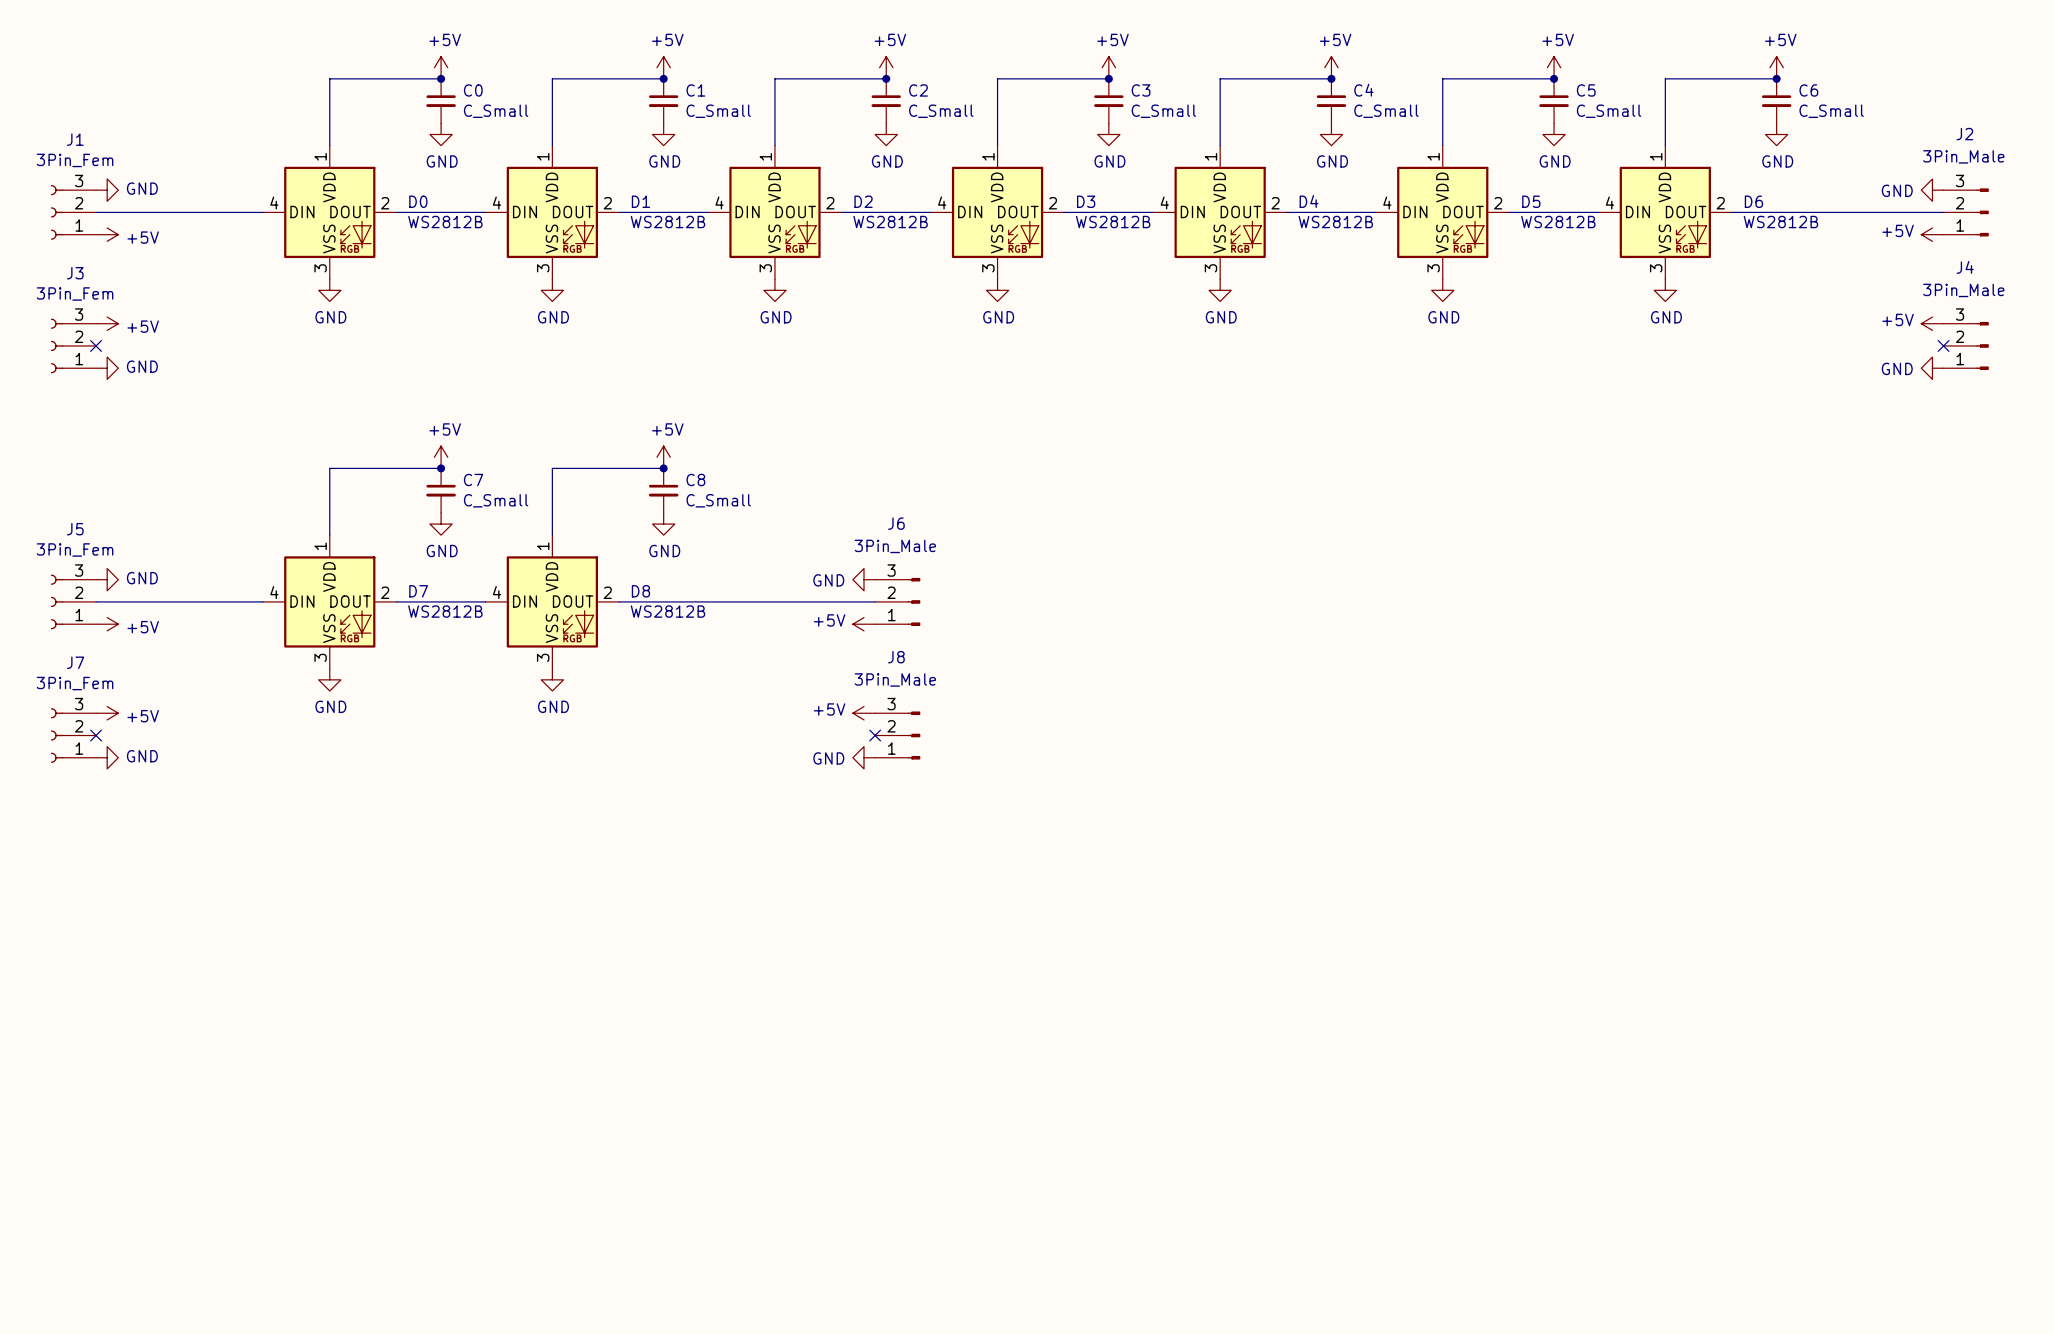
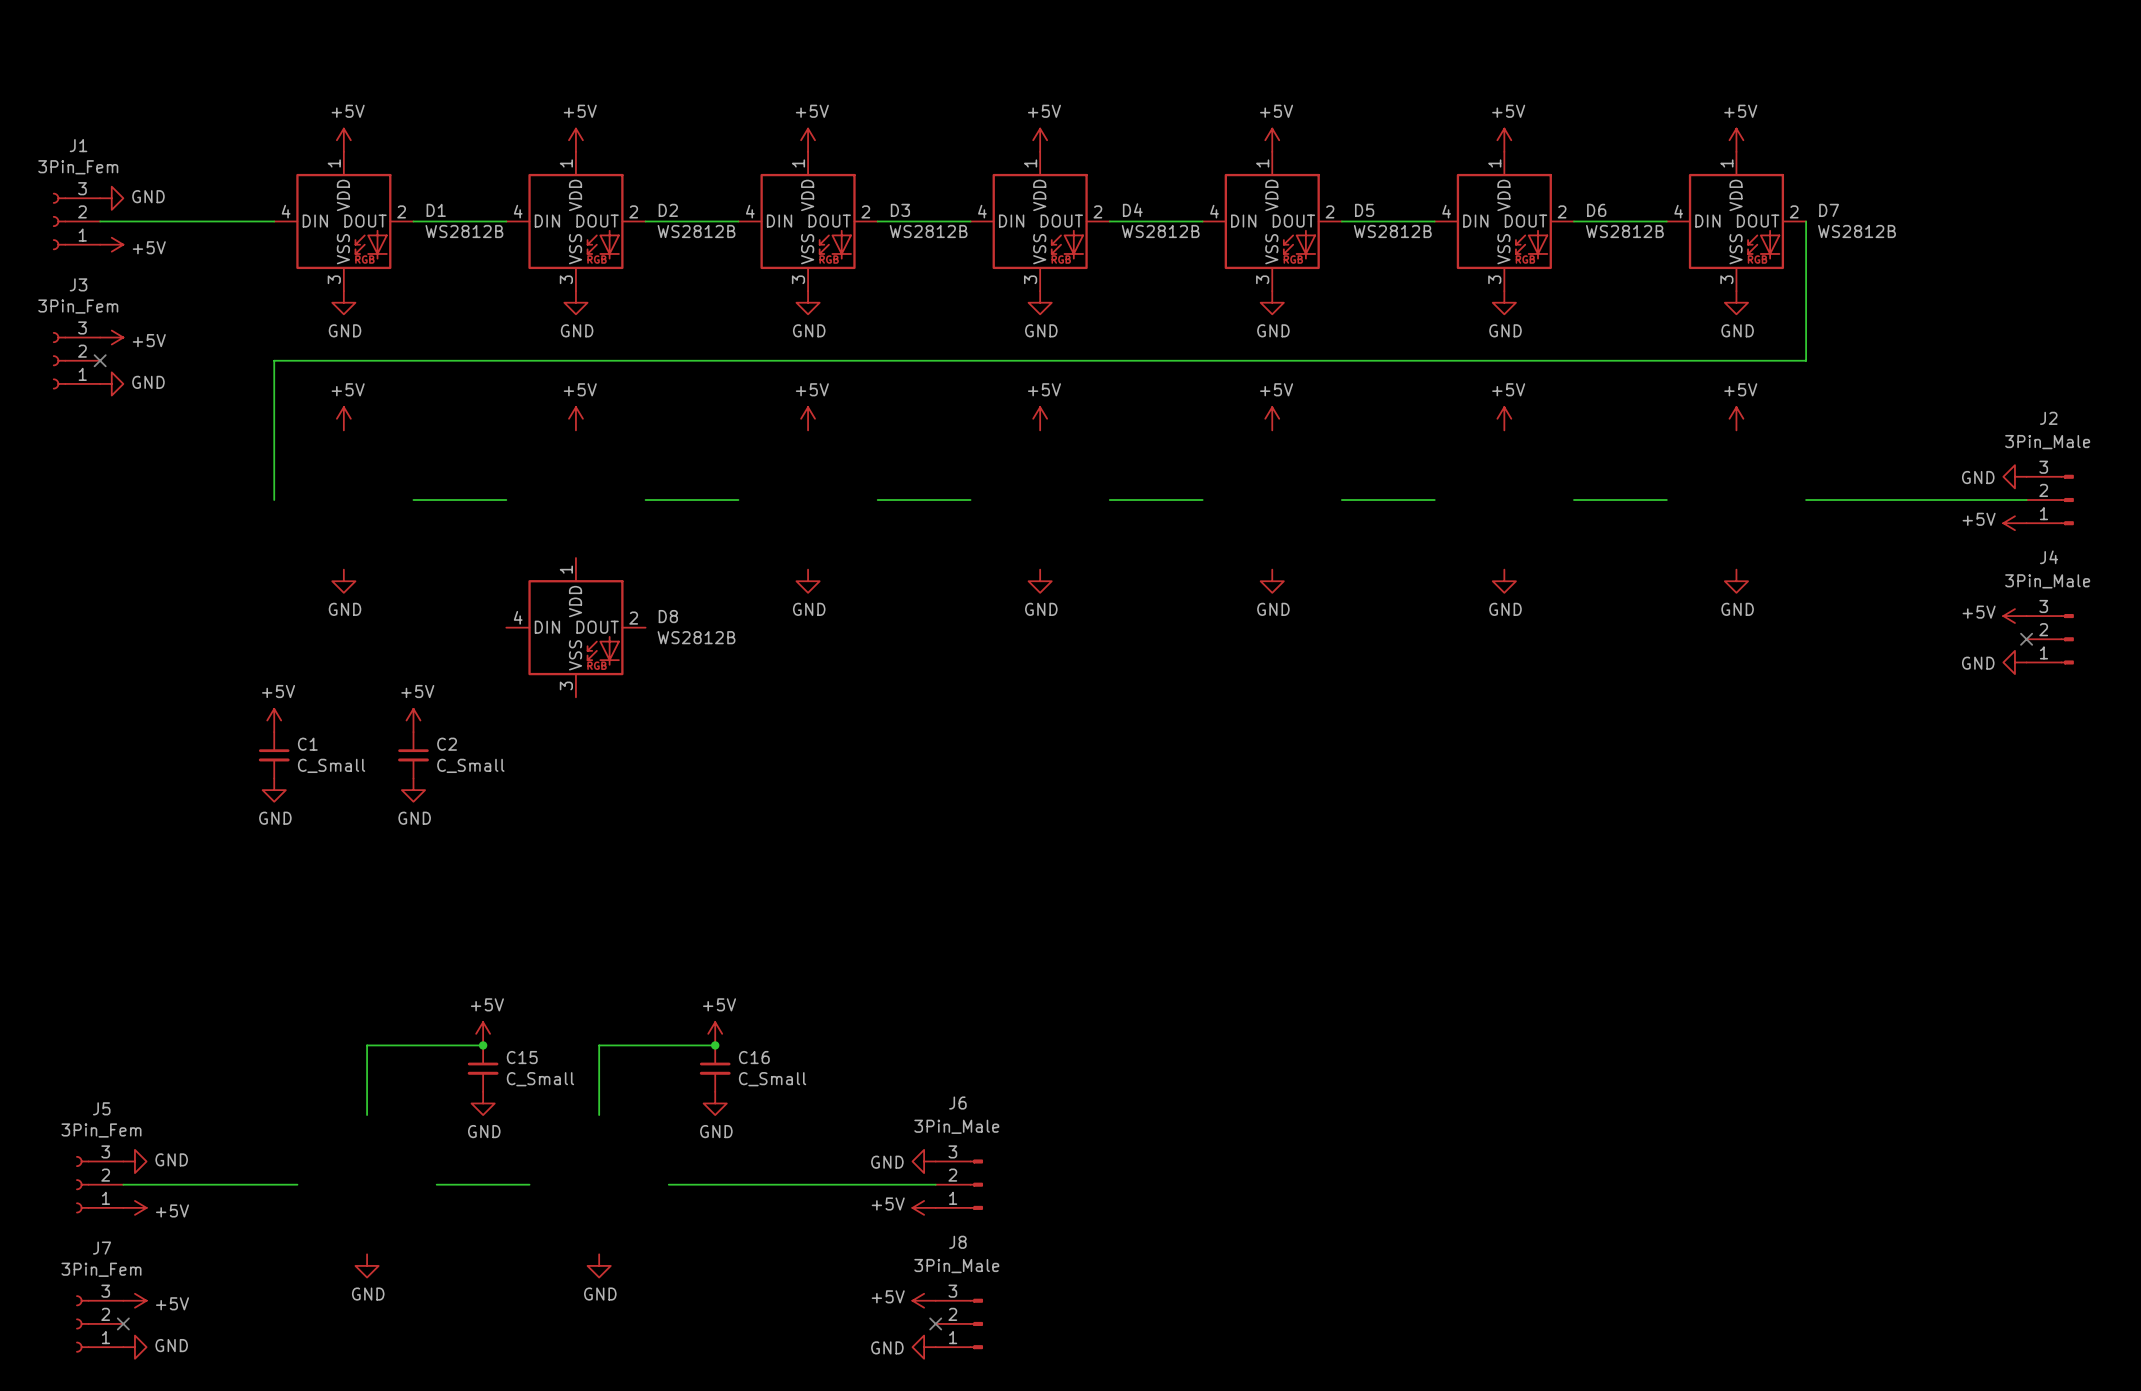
power symbol: +5V (441, 67) -> none
power symbol: +5V (663, 67) -> none
power symbol: +5V (886, 67) -> none
power symbol: +5V (1108, 67) -> none
power symbol: +5V (1331, 67) -> none
power symbol: +5V (1554, 67) -> none
power symbol: +5V (1776, 67) -> none
wire: (441, 78) (329, 78) (329, 145) -> none
junction: (441, 78) -> none
wire: (663, 78) (552, 78) (552, 145) -> none
junction: (663, 78) -> none
wire: (886, 78) (774, 78) (774, 145) -> none
junction: (886, 78) -> none
wire: (1108, 78) (997, 78) (997, 145) -> none
junction: (1108, 78) -> none
wire: (1331, 78) (1220, 78) (1220, 145) -> none
junction: (1331, 78) -> none
wire: (1554, 78) (1442, 78) (1442, 145) -> none
junction: (1554, 78) -> none
wire: (1776, 78) (1665, 78) (1665, 145) -> none
junction: (1776, 78) -> none
C0: C_Small (441, 101) -> none
C1 position: (663, 101) -> (274, 755)
C2 position: (886, 101) -> (413, 755)
C3: C_Small (1108, 101) -> none
C4: C_Small (1331, 101) -> none
C5: C_Small (1554, 101) -> none
C6: C_Small (1776, 101) -> none
power symbol: none -> +5V (343, 140)
power symbol: GND (441, 134) -> none
power symbol: none -> +5V (575, 140)
power symbol: GND (663, 134) -> none
power symbol: none -> +5V (808, 140)
power symbol: GND (886, 134) -> none
power symbol: none -> +5V (1040, 140)
power symbol: GND (1108, 134) -> none
power symbol: none -> +5V (1272, 140)
power symbol: GND (1331, 134) -> none
power symbol: none -> +5V (1504, 140)
power symbol: GND (1554, 134) -> none
power symbol: none -> +5V (1736, 140)
power symbol: GND (1776, 134) -> none
power symbol: GND (1932, 190) -> none
D0 name: D0 (418, 201) -> D1 (436, 210)
D1 name: D1 (640, 201) -> D2 (668, 210)
D2 name: D2 (863, 201) -> D3 (900, 210)
D3 name: D3 (1086, 201) -> D4 (1132, 210)
D4 name: D4 (1308, 201) -> D5 (1364, 210)
D5 name: D5 (1531, 201) -> D6 (1596, 210)
D6 name: D6 (1753, 201) -> D7 (1829, 210)
wire: (1732, 212) (1943, 212) -> (1806, 221) (1806, 360) (274, 360) (274, 500)
J2 position: (1966, 212) -> (2050, 500)
power symbol: +5V (1932, 234) -> none
power symbol: +5V (1932, 323) -> none
no-connect mark: (1943, 345) -> none
J4 position: (1966, 345) -> (2050, 639)
power symbol position: GND (1932, 368) -> GND (2014, 476)
power symbol: none -> +5V (343, 418)
power symbol: none -> +5V (575, 418)
power symbol: none -> +5V (808, 418)
power symbol: none -> +5V (1040, 418)
power symbol: none -> +5V (1272, 418)
power symbol: none -> +5V (1504, 418)
power symbol: none -> +5V (1736, 418)
power symbol: +5V (441, 457) -> none
power symbol: +5V (663, 457) -> none
wire: (441, 468) (329, 468) (329, 535) -> none
junction: (441, 468) -> none
wire: (663, 468) (552, 468) (552, 535) -> none
junction: (663, 468) -> none
wire: none -> (645, 500) (738, 500)
wire: none -> (877, 500) (970, 500)
wire: none -> (1109, 500) (1202, 500)
wire: none -> (1341, 500) (1434, 500)
wire: none -> (1573, 500) (1666, 500)
wire: none -> (1806, 500) (2026, 500)
C7: C_Small (441, 490) -> none
C8: C_Small (663, 490) -> none
power symbol: none -> +5V (2014, 523)
power symbol: GND (441, 524) -> none
power symbol: GND (663, 524) -> none
power symbol: none -> GND (343, 581)
power symbol: none -> GND (808, 581)
power symbol: none -> GND (1040, 581)
power symbol: none -> GND (1272, 581)
power symbol: none -> GND (1504, 581)
power symbol: none -> GND (1736, 581)
power symbol: GND (107, 579) -> none
power symbol: GND (864, 579) -> none
power symbol: none -> +5V (2014, 616)
J5 position: (73, 601) -> (99, 1184)
wire: (96, 601) (263, 601) -> none
D7: WS2812B (329, 601) -> none
wire: (396, 601) (485, 601) -> (413, 500) (506, 500)
wire: (619, 601) (875, 601) -> none
J6 position: (897, 601) -> (959, 1184)
no-connect mark: none -> (2026, 639)
power symbol: +5V (107, 624) -> none
power symbol: +5V (864, 624) -> none
power symbol: none -> GND (2014, 662)
power symbol: GND (329, 679) -> none
power symbol: GND (552, 679) -> none
power symbol: none -> +5V (274, 720)
power symbol: none -> +5V (413, 720)
power symbol: +5V (107, 713) -> none
power symbol: +5V (864, 713) -> none
J7 position: (73, 735) -> (99, 1323)
no-connect mark: (96, 735) -> none
no-connect mark: (875, 735) -> none
J8 position: (897, 735) -> (959, 1323)
power symbol: GND (107, 757) -> none
power symbol: none -> GND (274, 790)
power symbol: none -> GND (413, 790)
power symbol: GND (864, 757) -> none
power symbol: none -> +5V (483, 1033)
power symbol: none -> +5V (715, 1033)
wire: none -> (483, 1045) (367, 1045) (367, 1115)
junction: none -> (483, 1045)
wire: none -> (715, 1045) (599, 1045) (599, 1115)
junction: none -> (715, 1045)
C15: none -> C_Small (483, 1068)
C16: none -> C_Small (715, 1068)
power symbol: none -> GND (483, 1103)
power symbol: none -> GND (715, 1103)
power symbol: none -> GND (134, 1161)
power symbol: none -> GND (924, 1161)
wire: none -> (123, 1184) (297, 1184)
wire: none -> (436, 1184) (529, 1184)
wire: none -> (668, 1184) (935, 1184)
power symbol: none -> +5V (134, 1207)
power symbol: none -> +5V (924, 1207)
power symbol: none -> GND (367, 1265)
power symbol: none -> GND (599, 1265)
power symbol: none -> +5V (134, 1300)
power symbol: none -> +5V (924, 1300)
no-connect mark: none -> (123, 1323)
no-connect mark: none -> (935, 1323)
power symbol: none -> GND (134, 1347)
power symbol: none -> GND (924, 1347)

